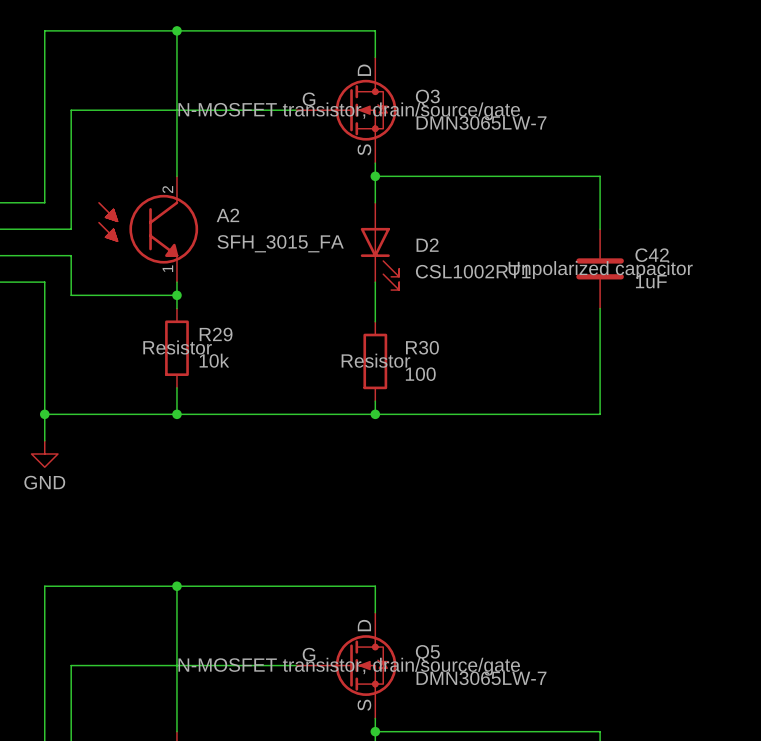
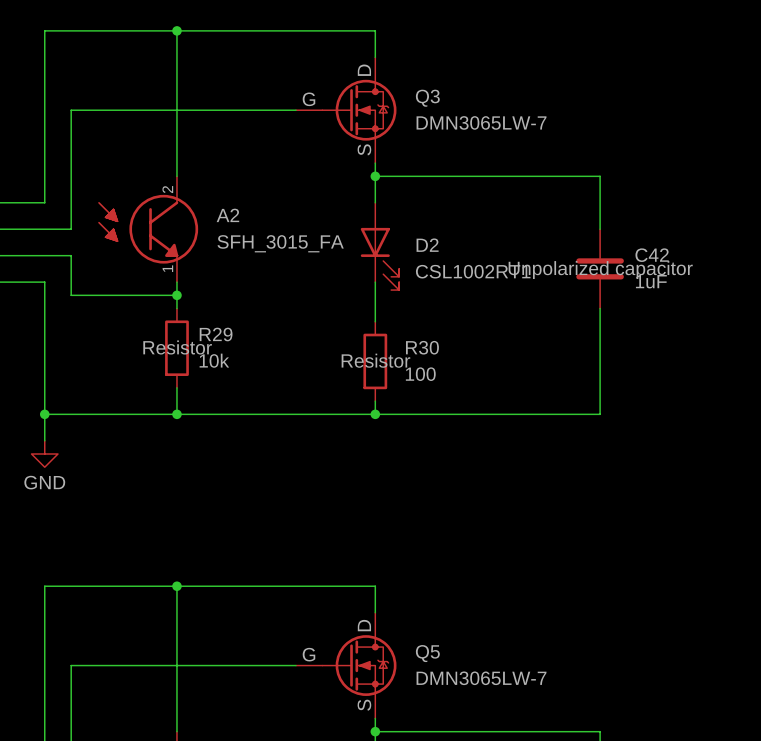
Q3 text: N-MOSFET transistor, drain/source/gate (349, 111) -> none
Q5 text: N-MOSFET transistor, drain/source/gate (349, 666) -> none

